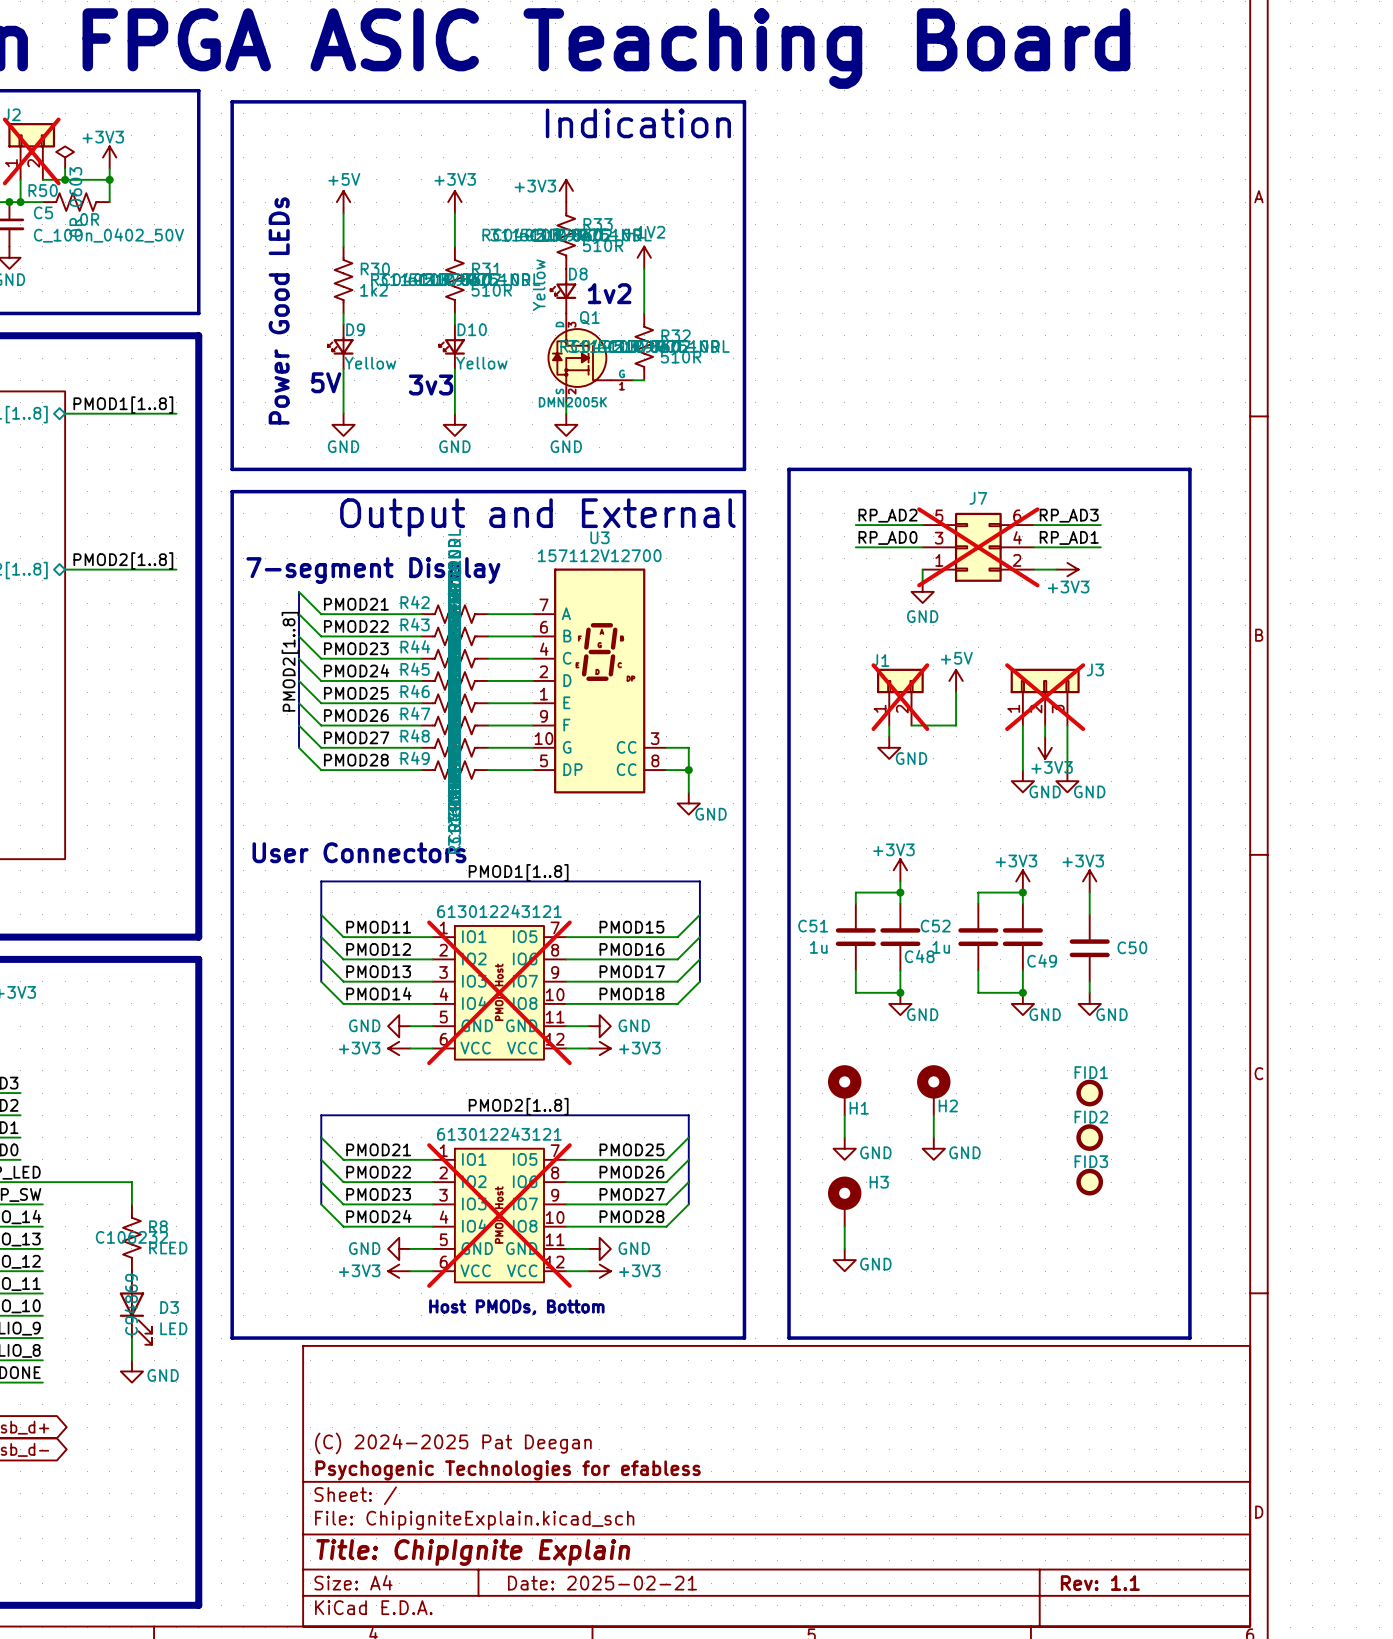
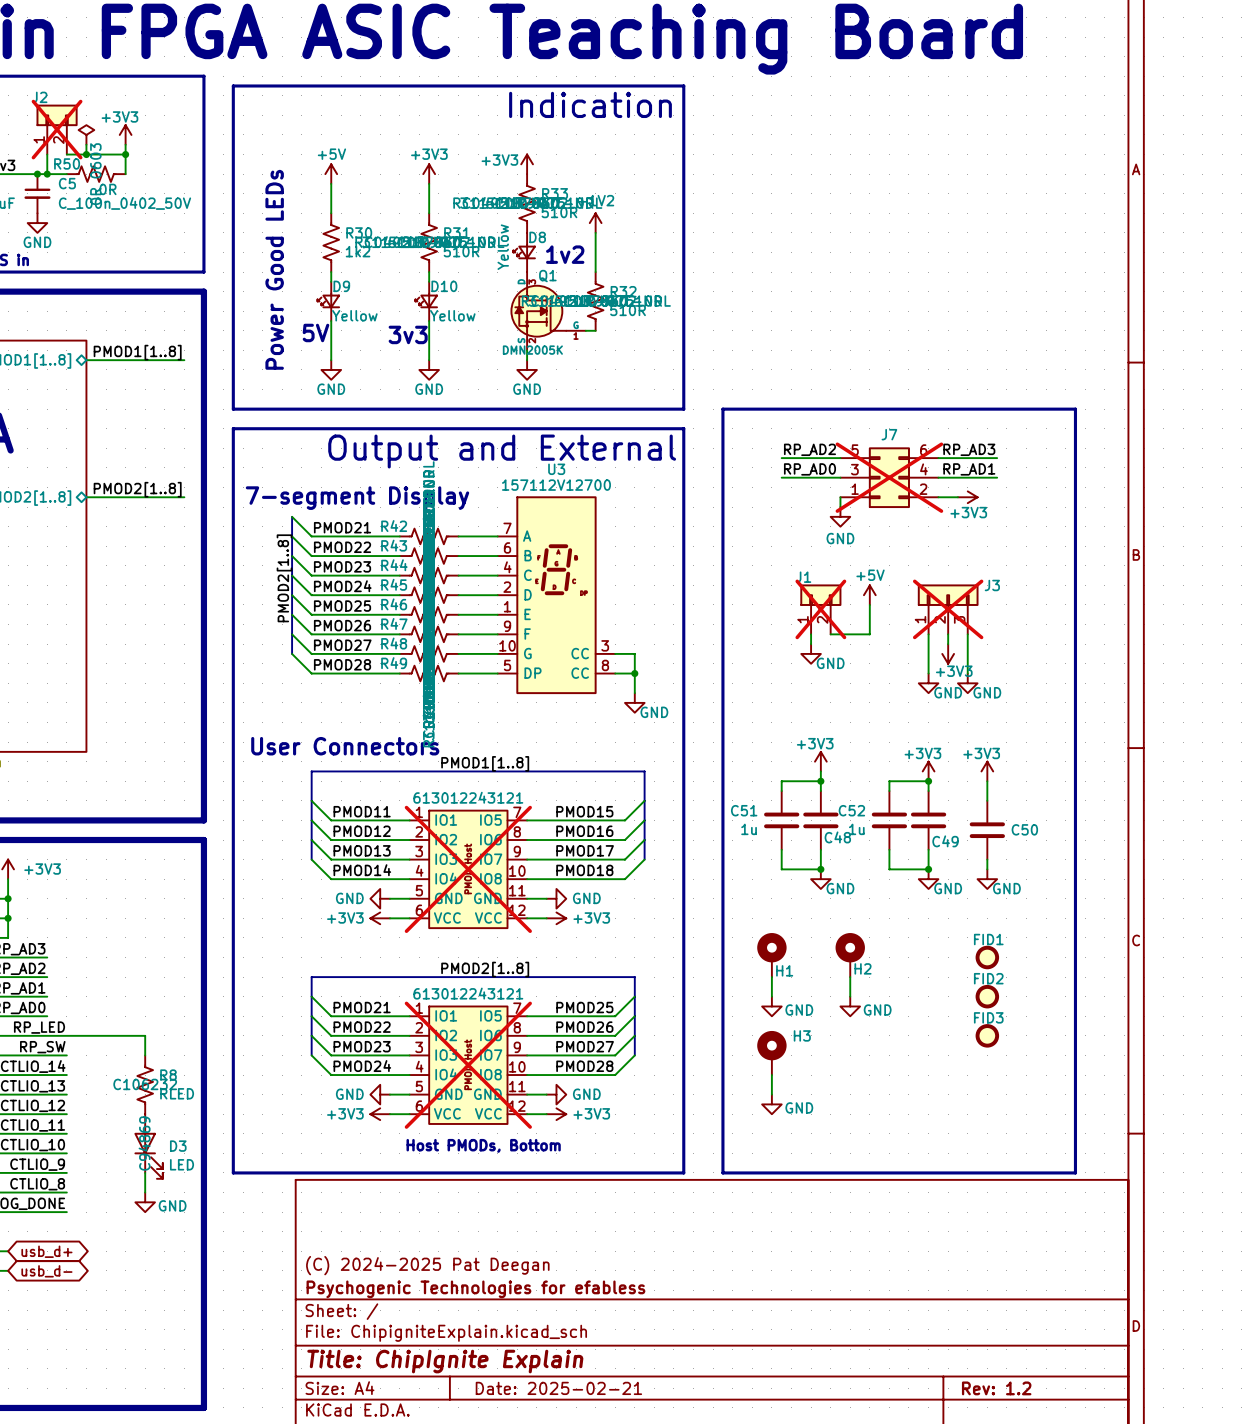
title block: Rev: 1.1 (1100, 1583) -> Rev: 1.2 (996, 1388)

